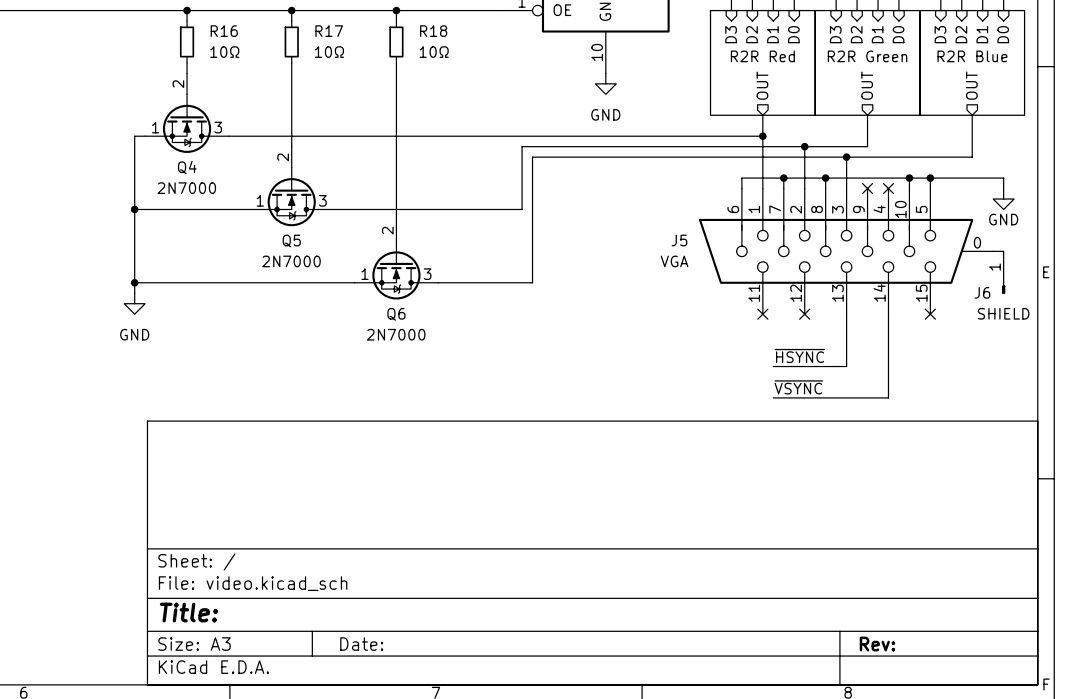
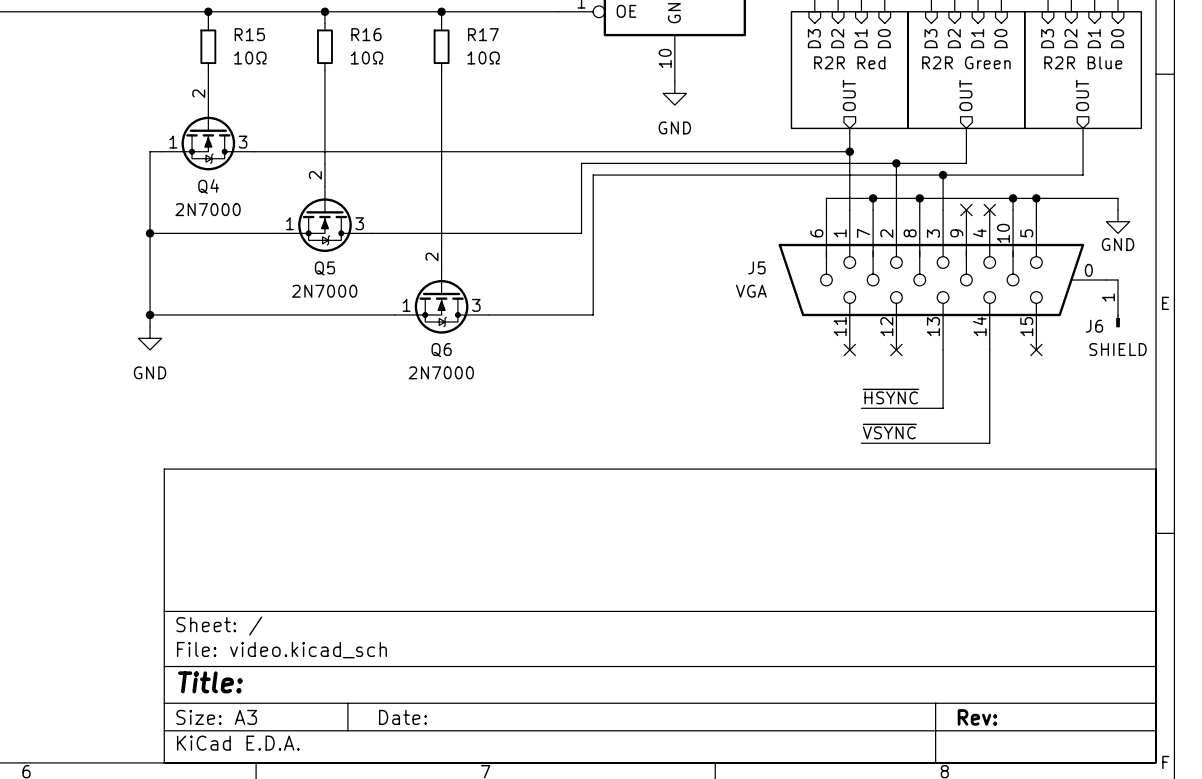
R16 name: R16 (224, 31) -> R15 (249, 34)
R17 name: R17 (329, 31) -> R16 (366, 34)
R18 name: R18 (433, 31) -> R17 (483, 34)

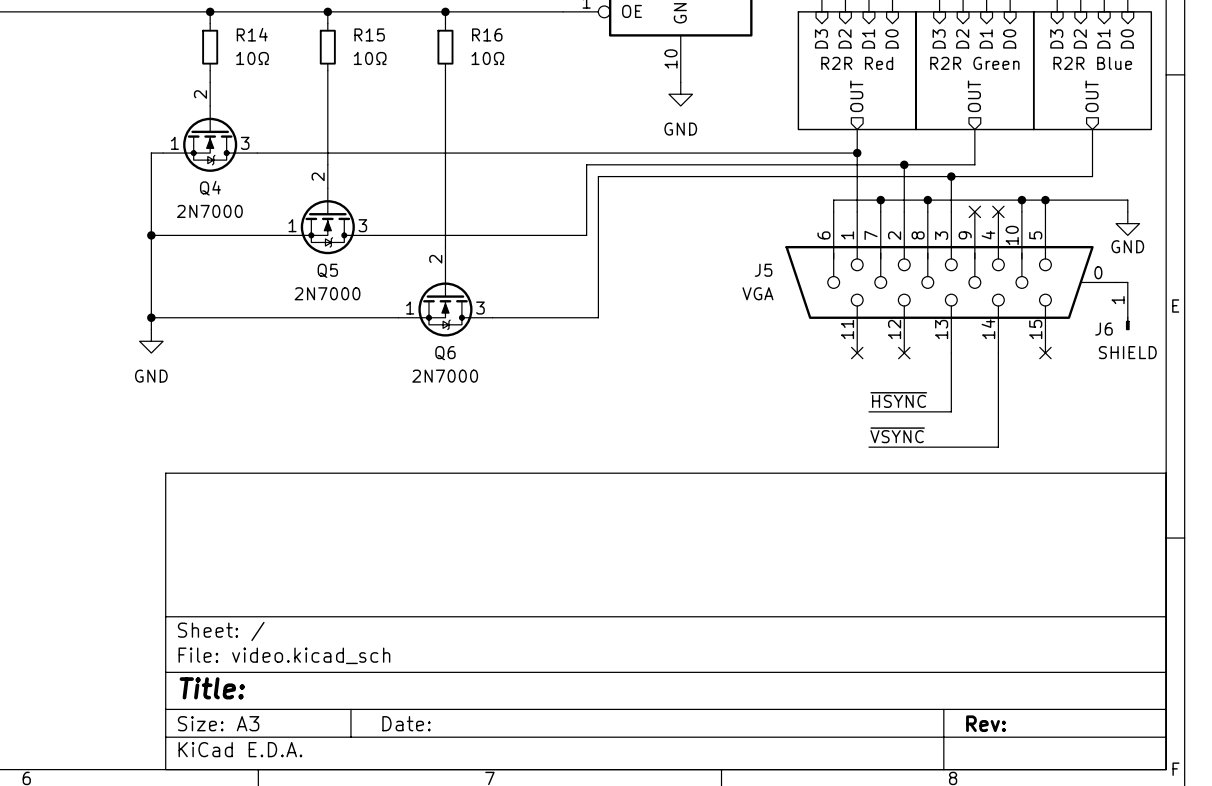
R15 name: R15 (249, 34) -> R14 (252, 34)
R16 name: R16 (366, 34) -> R15 (369, 34)
R17 name: R17 (483, 34) -> R16 (487, 34)

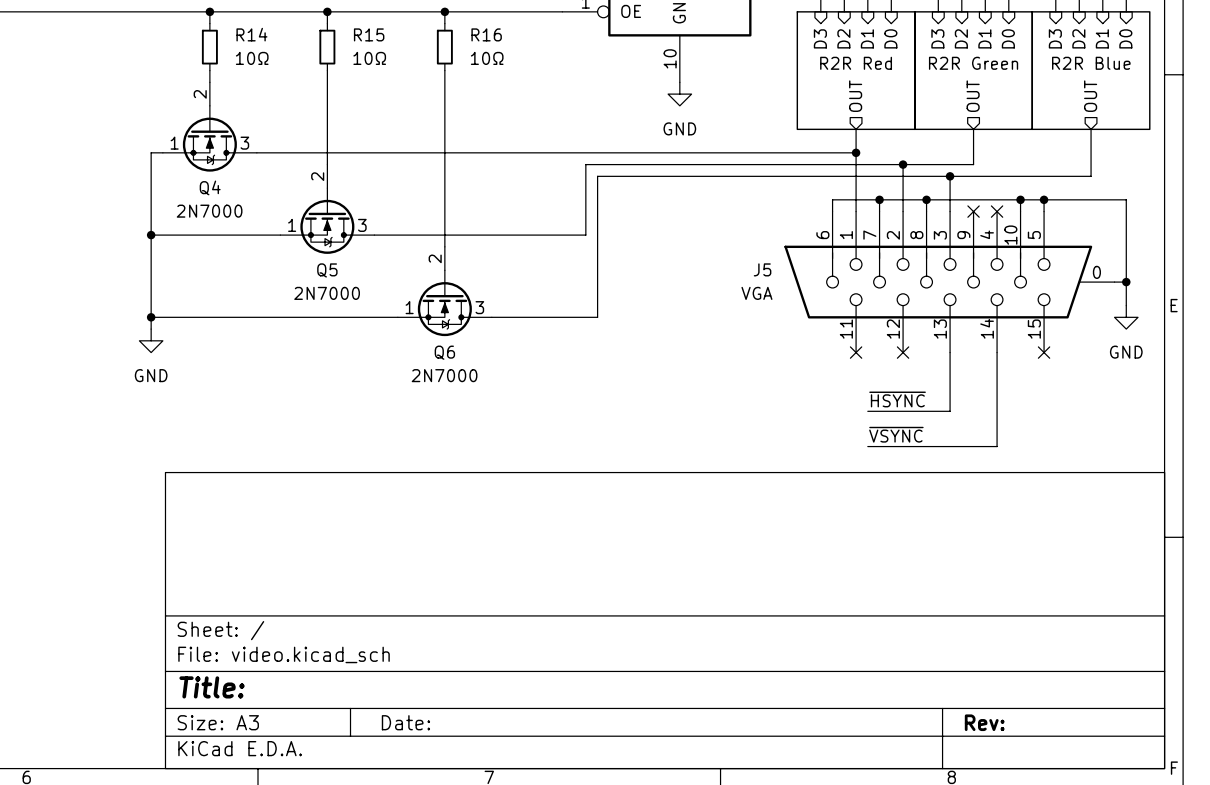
wire: none -> (1126, 211) (1126, 305)
power symbol position: GND (1127, 223) -> GND (1126, 317)
power symbol text position: GND (1127, 246) -> GND (1126, 352)
junction: none -> (1126, 282)
J6: SHIELD (1127, 306) -> none

